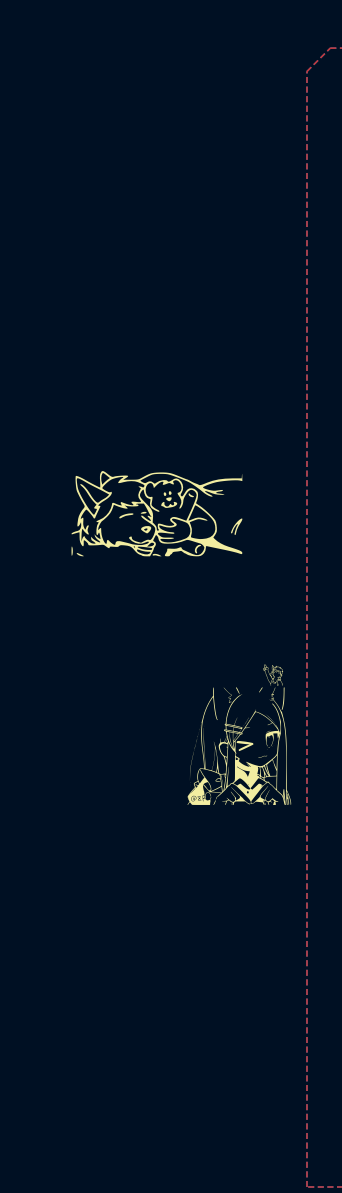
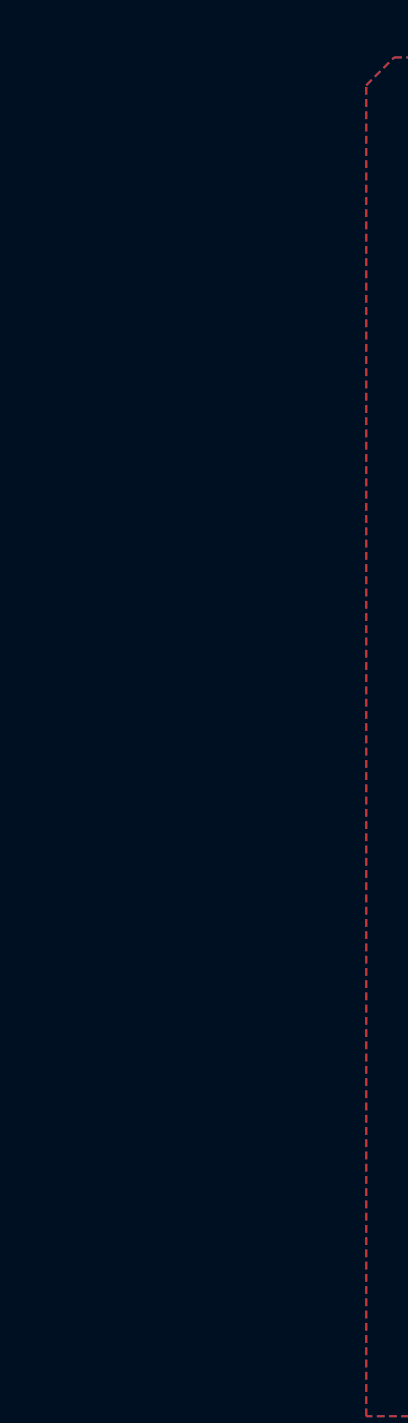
drawing: [71, 471, 243, 557] -> none
drawing: [187, 664, 292, 805] -> none

